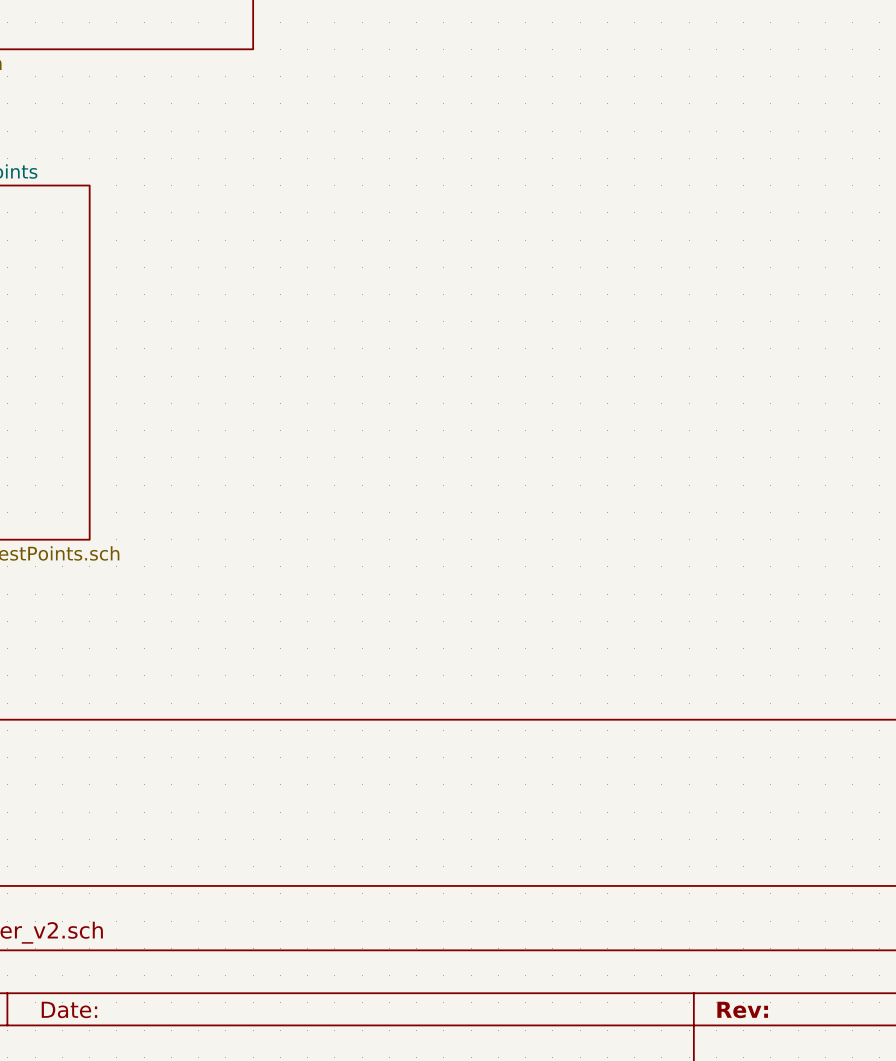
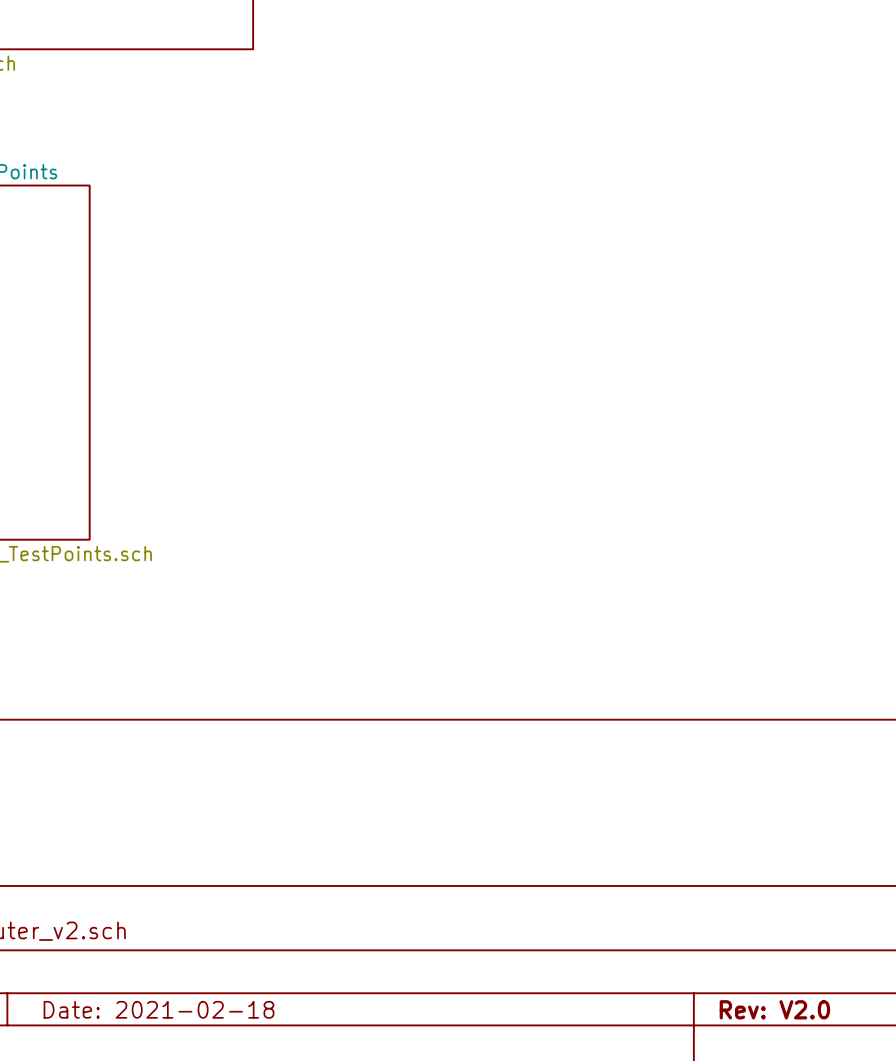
title block: Date: (69, 1009) -> Date: 2021-02-18 (159, 1009)
title block: Rev: (742, 1009) -> Rev: V2.0 (774, 1009)

